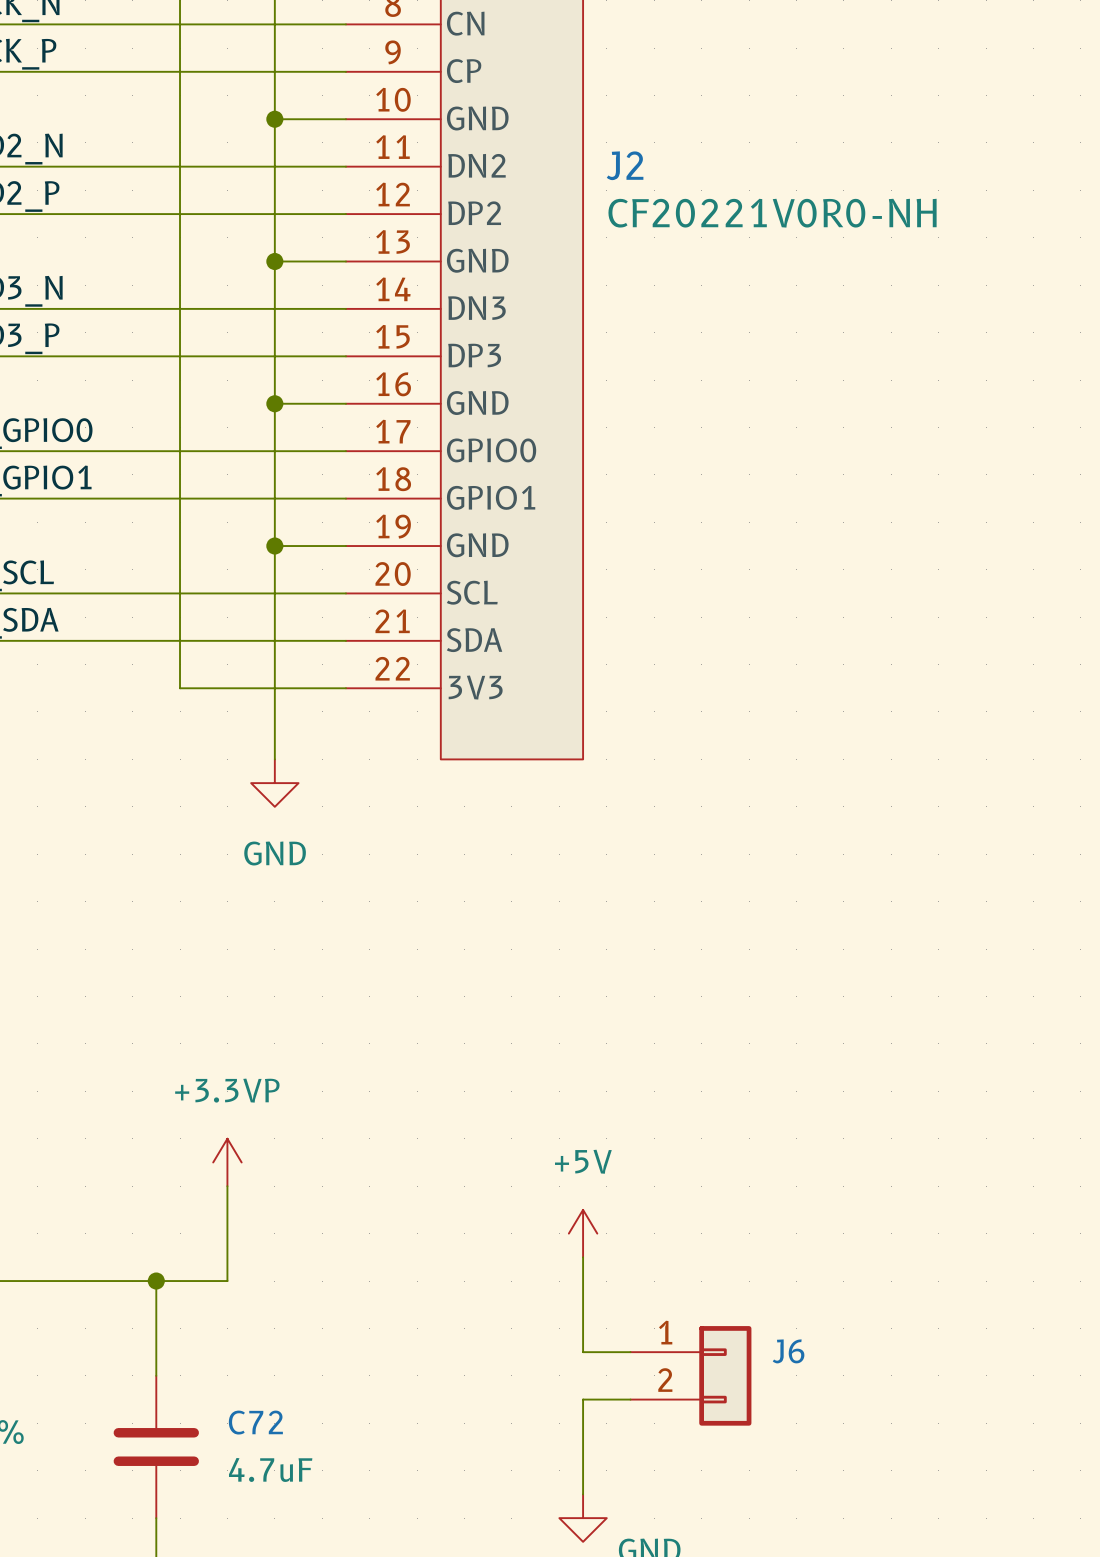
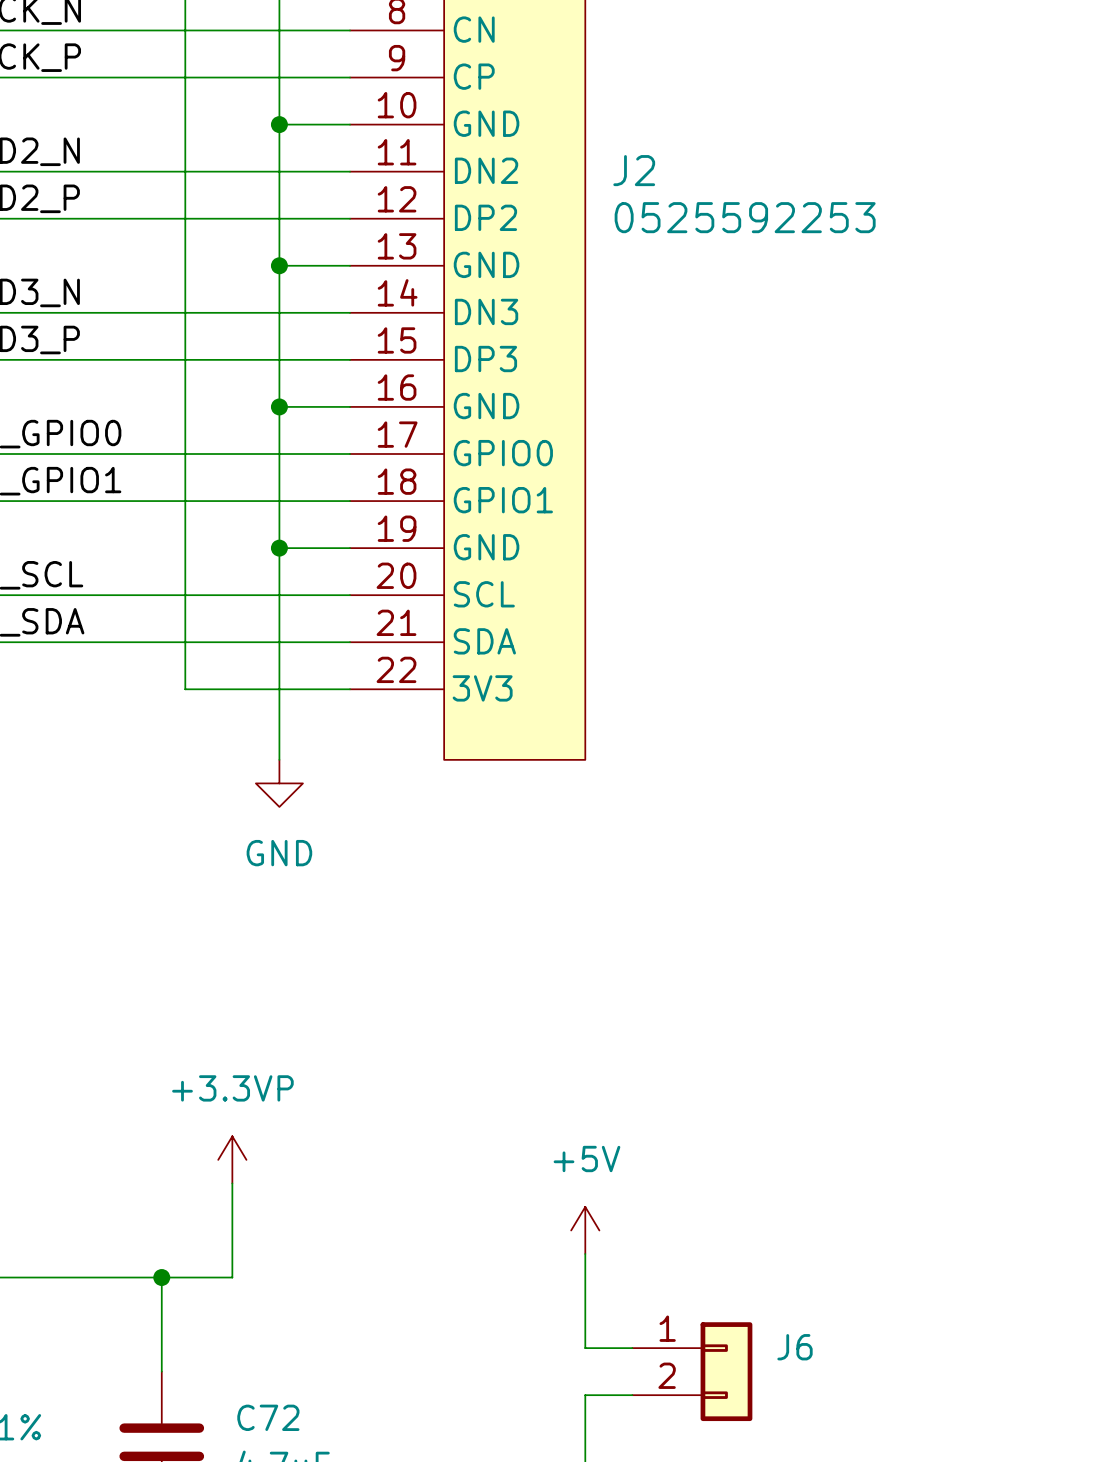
J2 value: CF20221V0R0-NH (772, 213) -> 0525592253 (745, 217)

